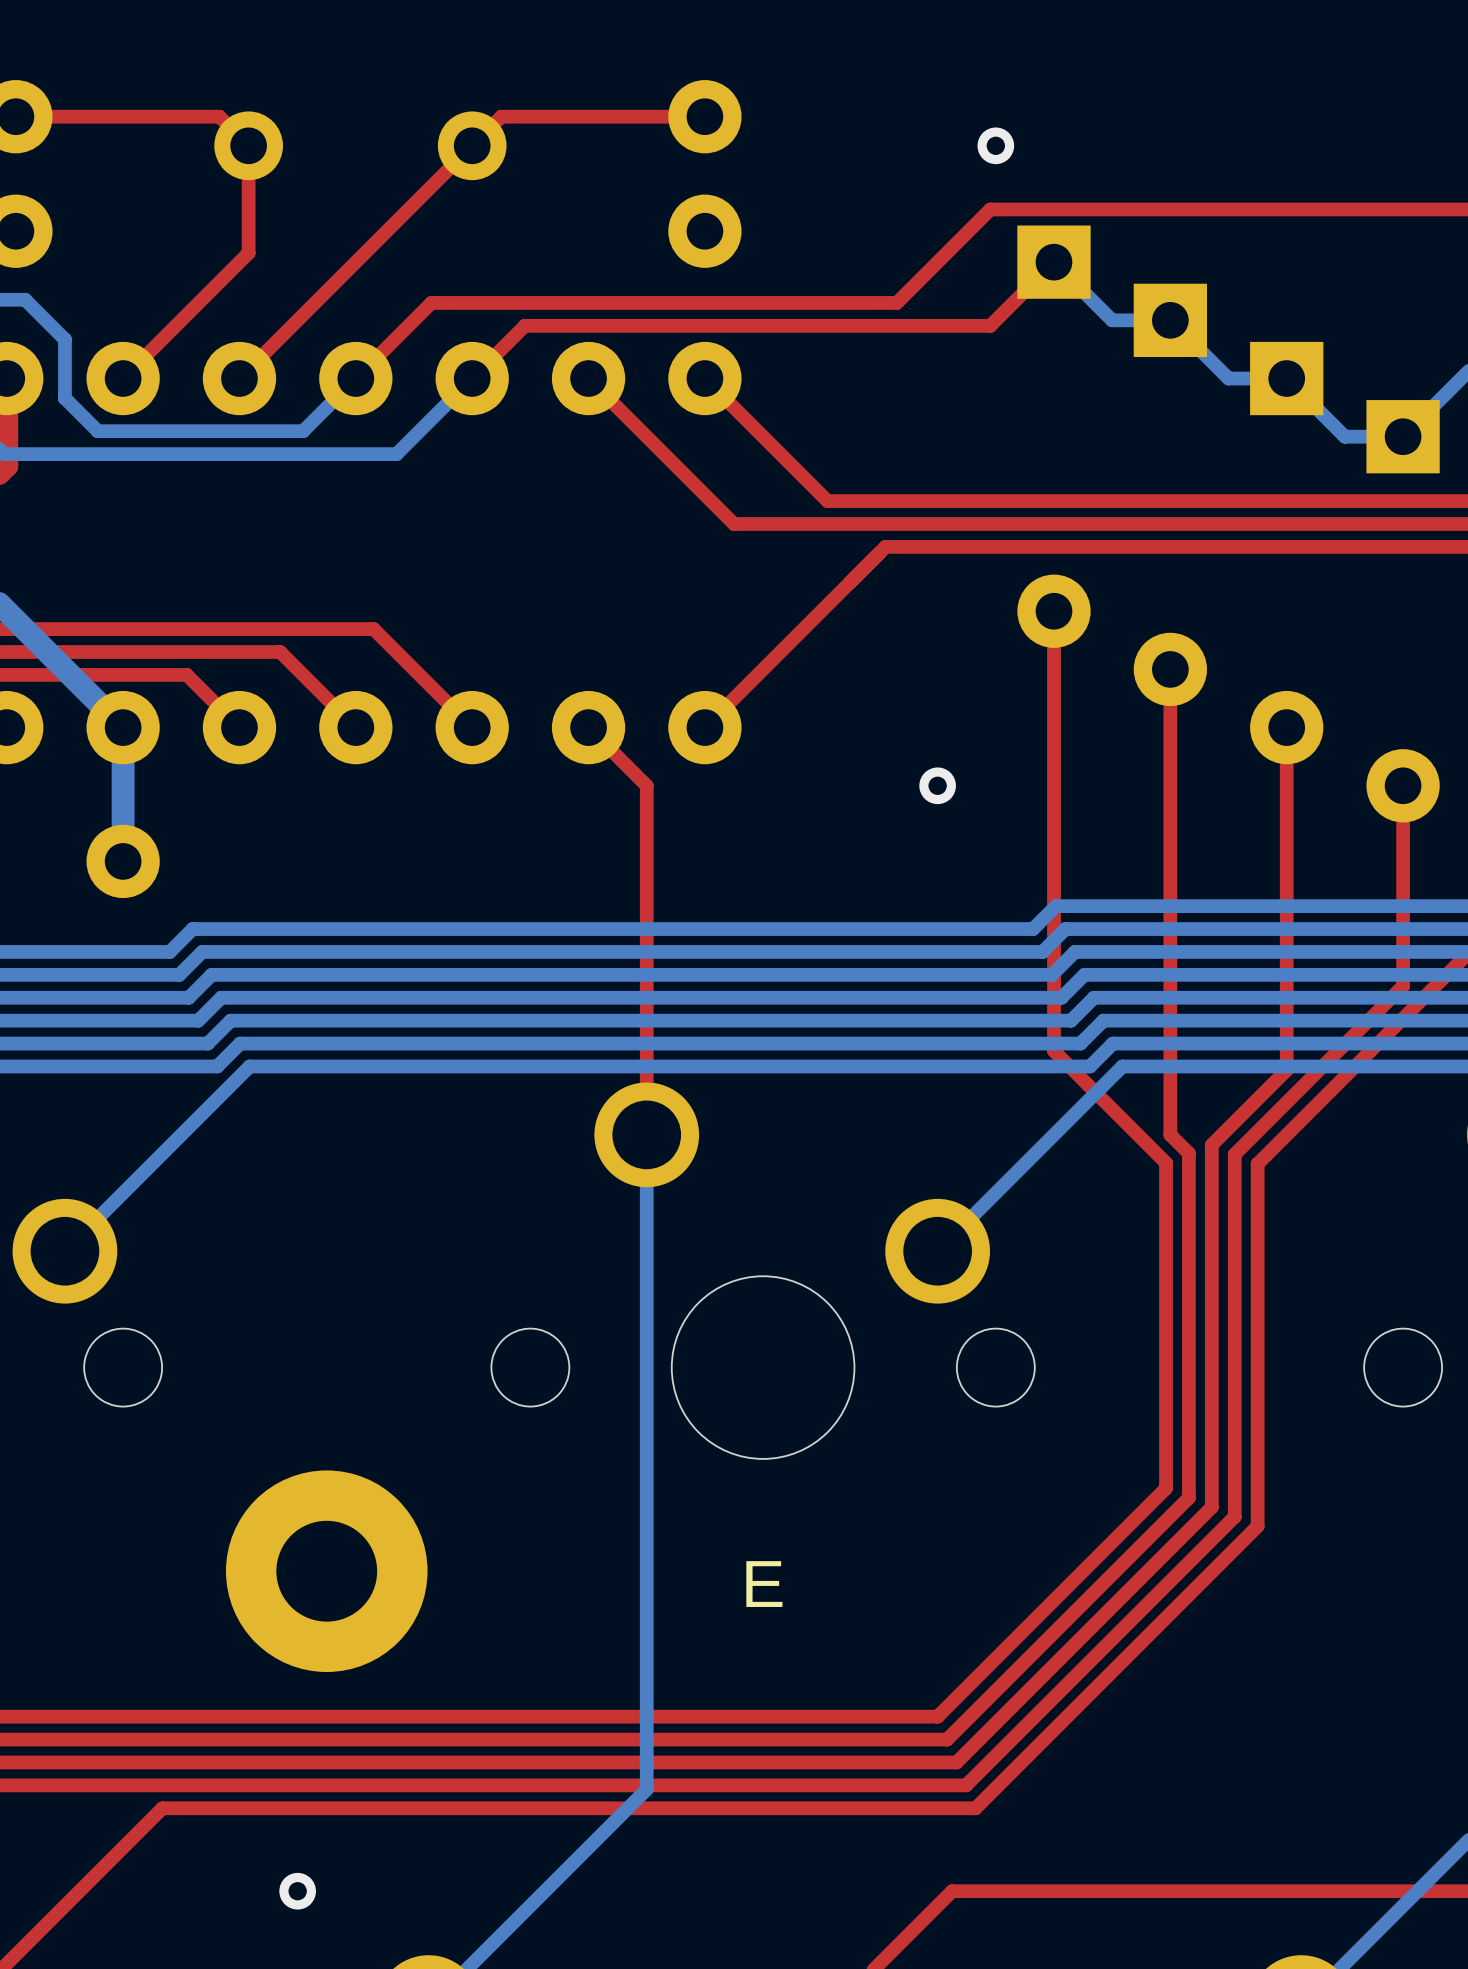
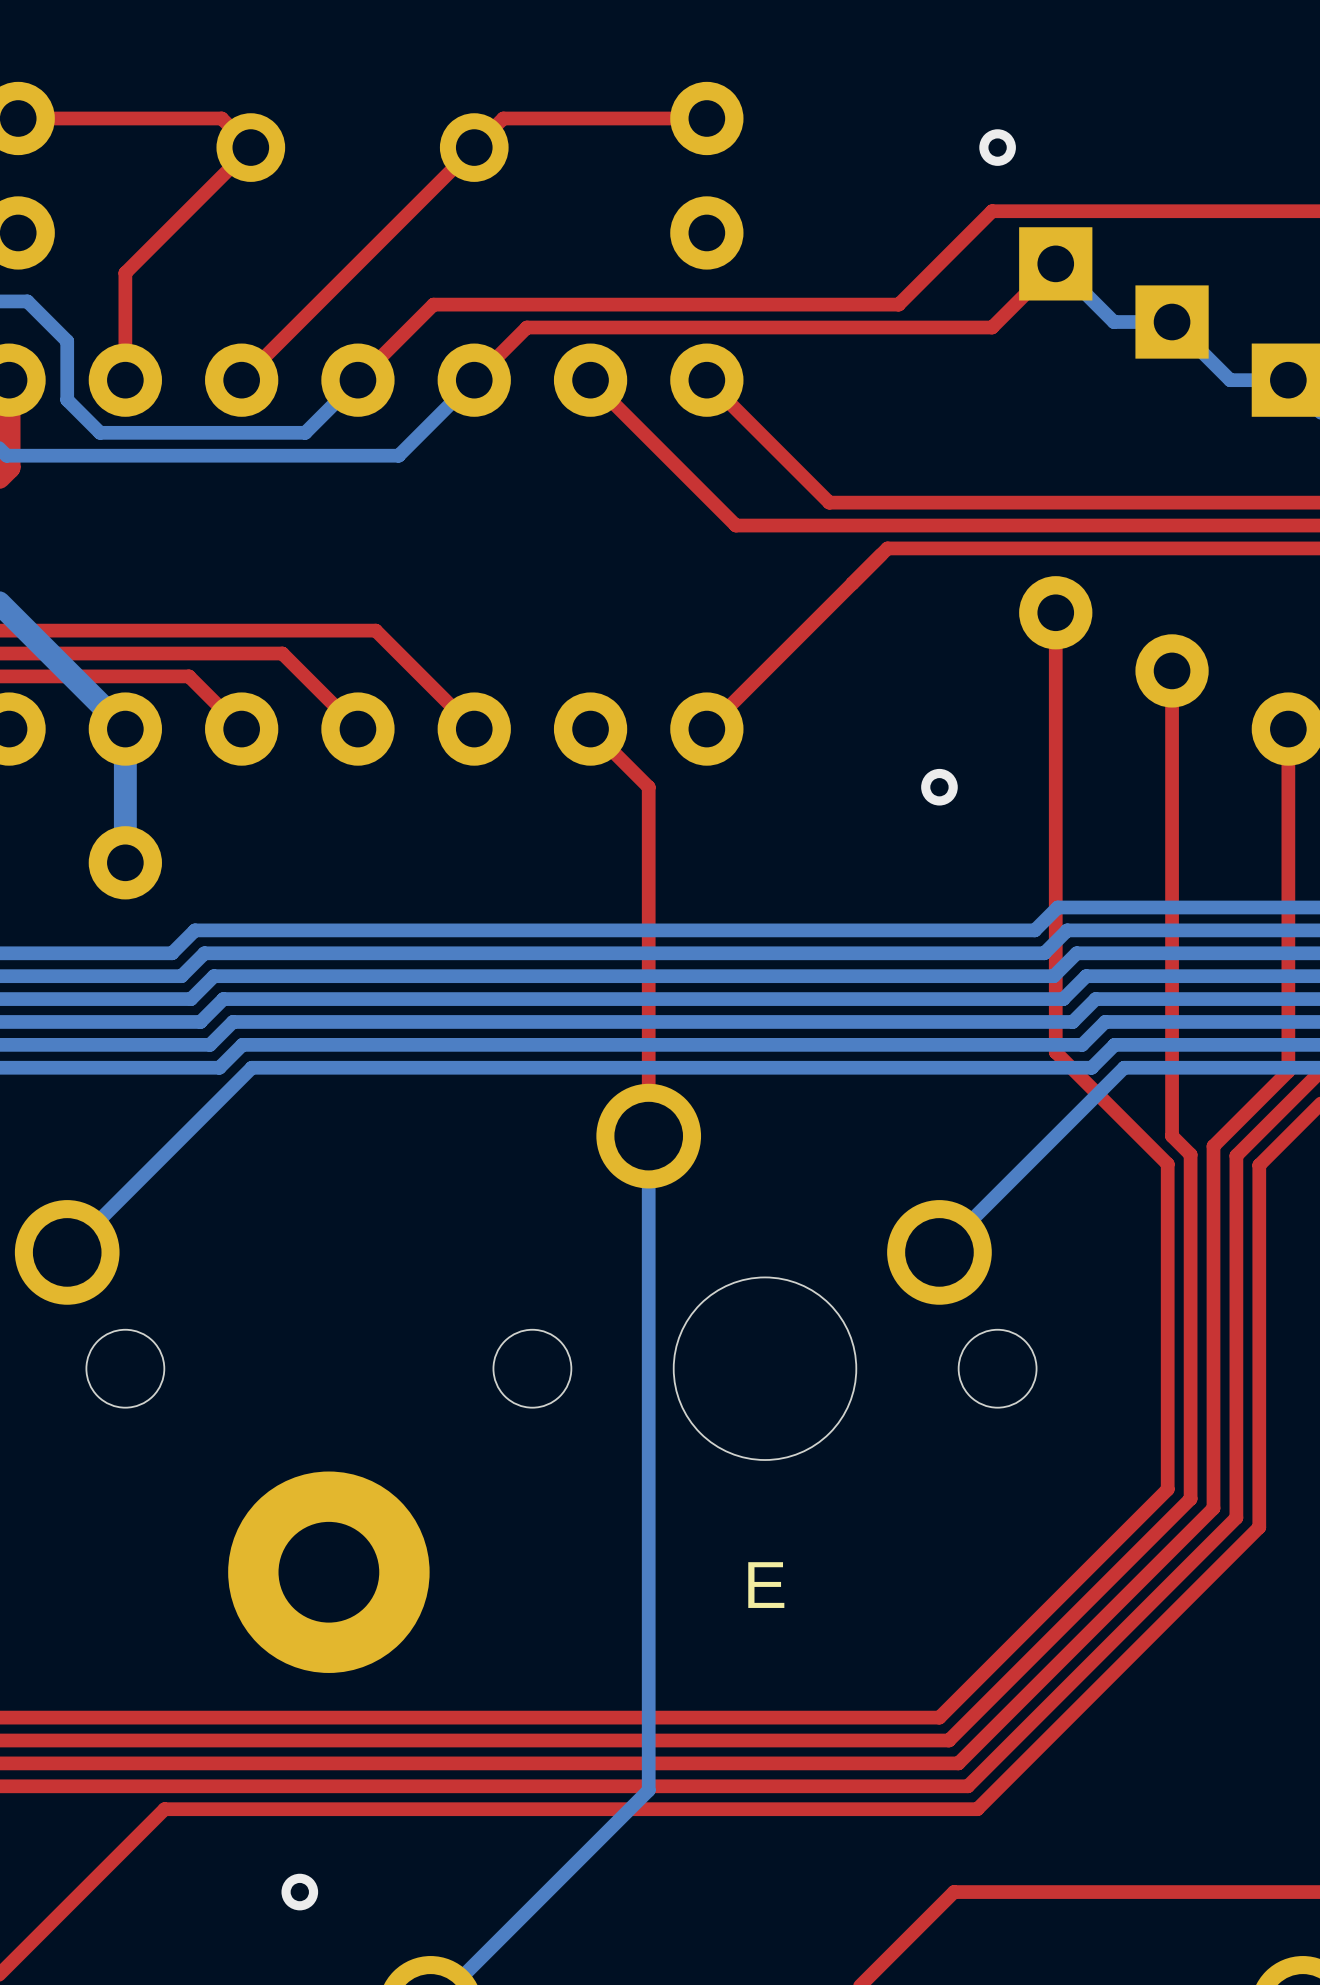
top track: (248, 145) (248, 253) (123, 378) -> (250, 147) (125, 273) (125, 380)

